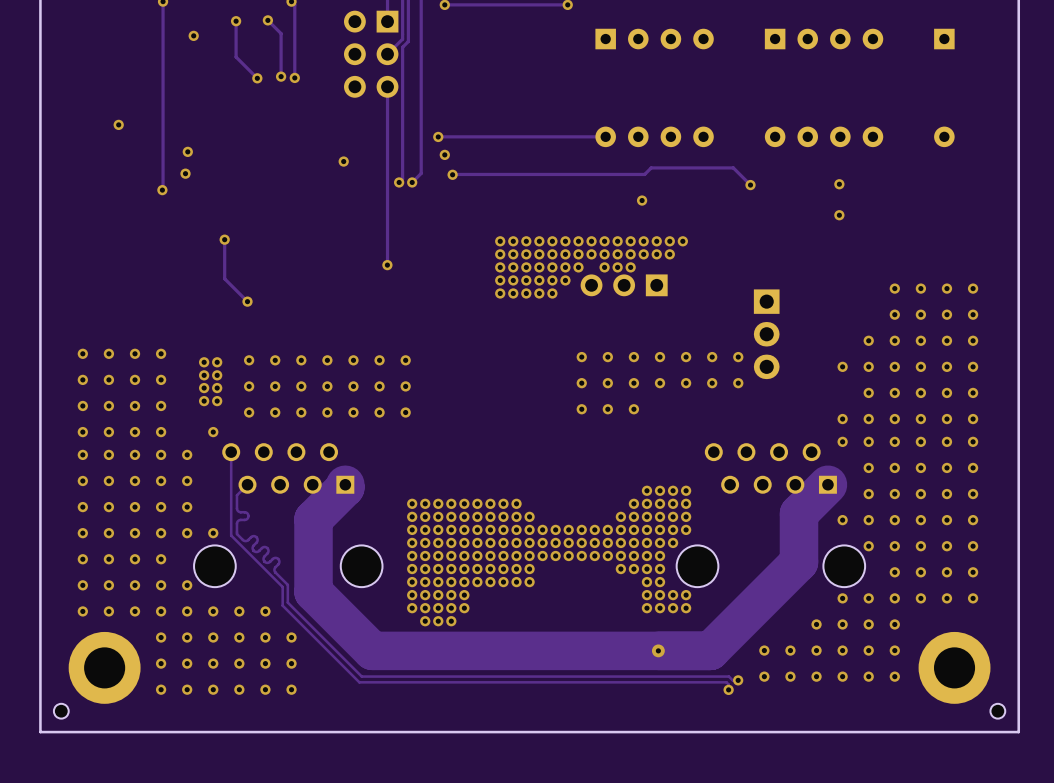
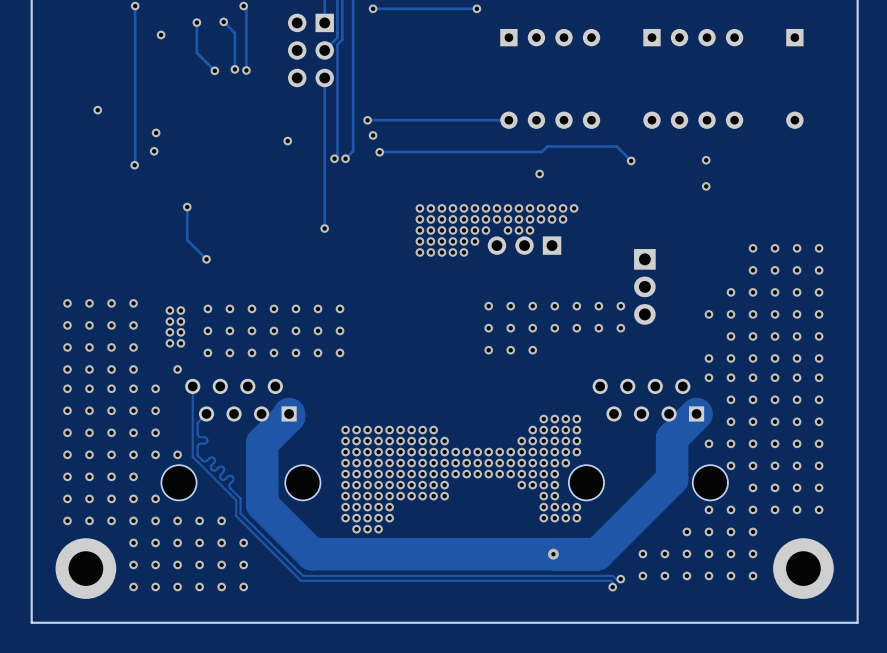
part: (61, 711) -> none
part: (997, 711) -> none

